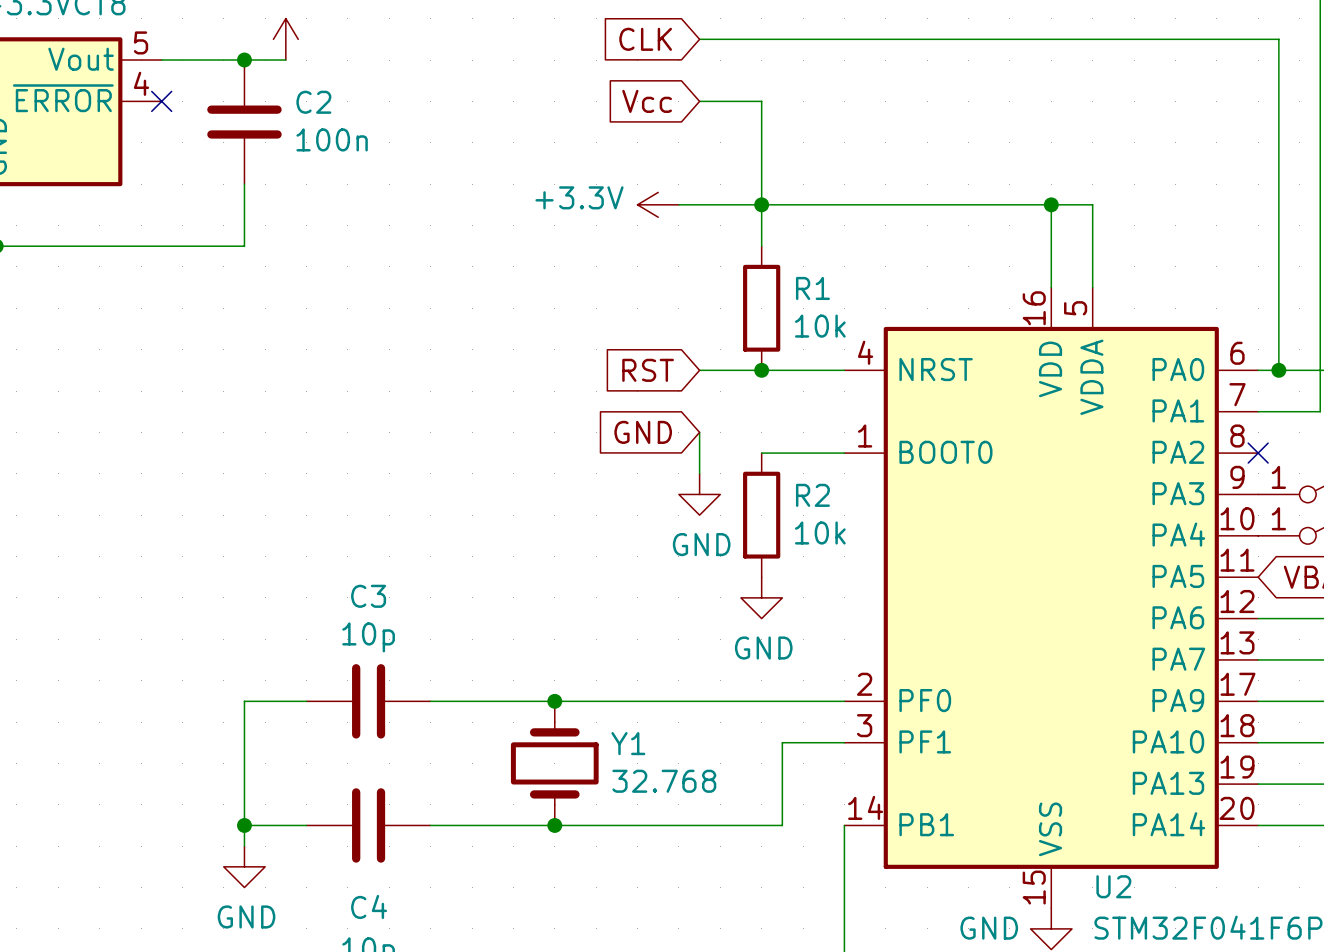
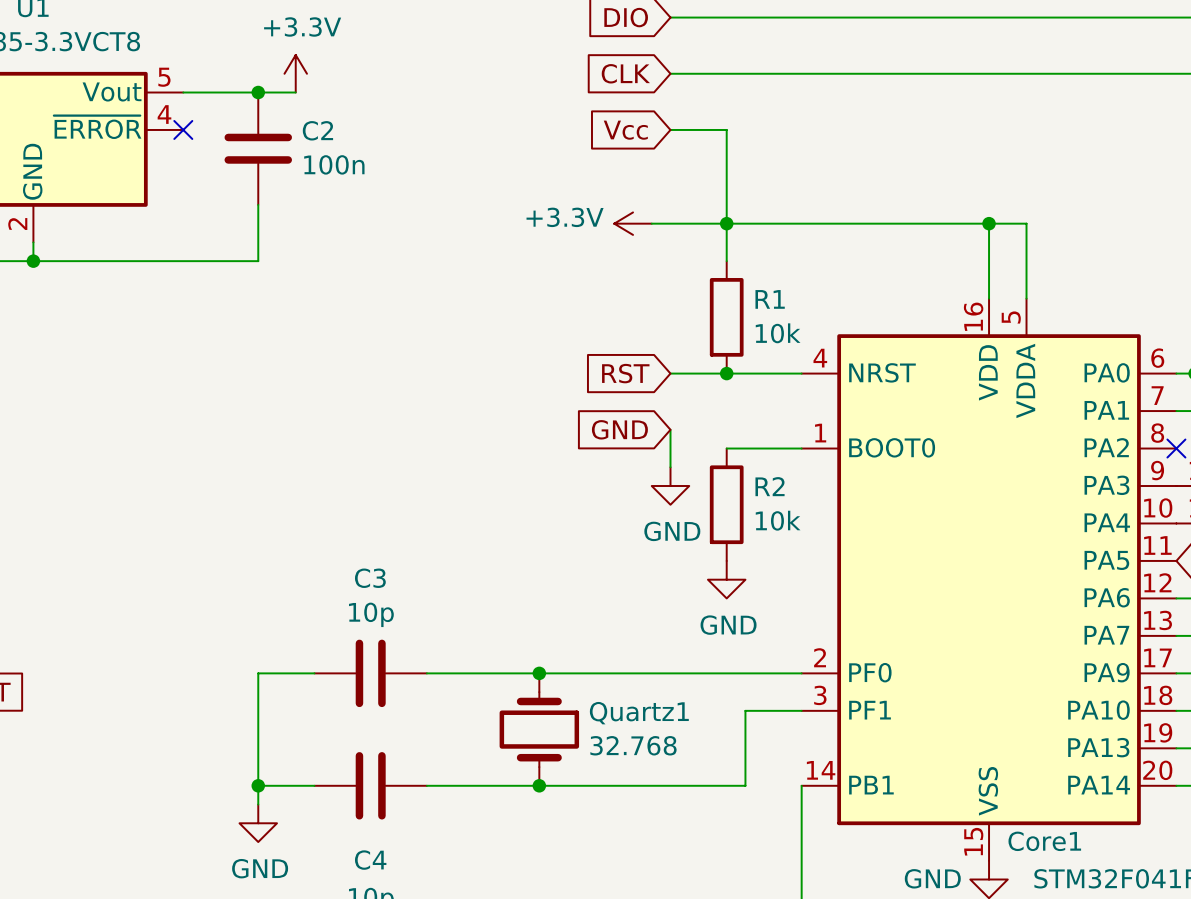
Y1 name: Y1 (628, 743) -> Quartz1 (639, 713)
U2 name: U2 (1113, 886) -> Core1 (1044, 841)

